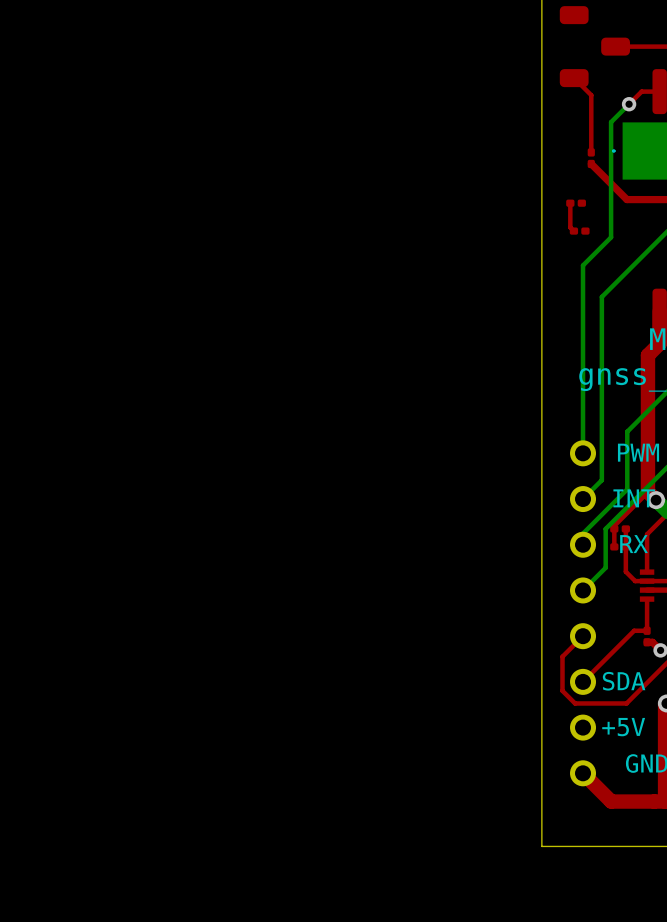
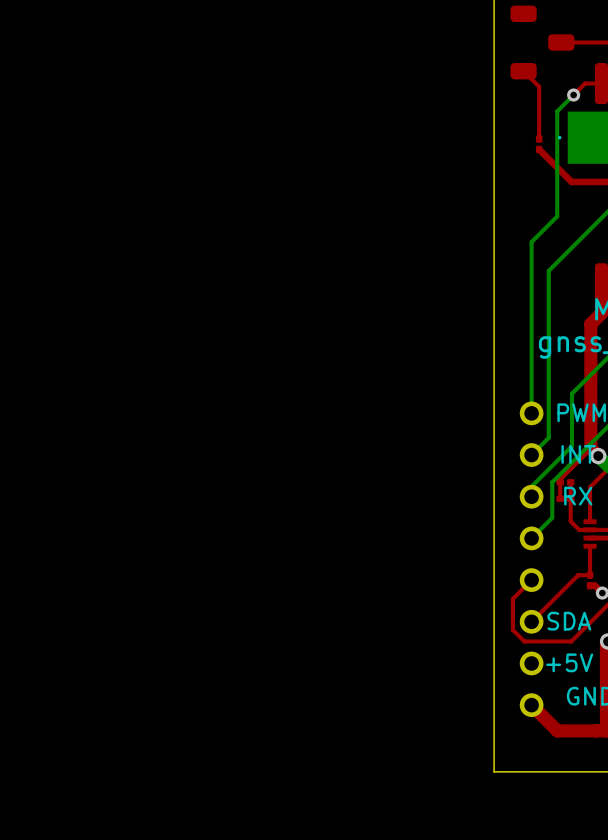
top track: (570, 203) (570, 227) (573, 231) -> none
part: (576, 203) -> none
part: (579, 231) -> none

